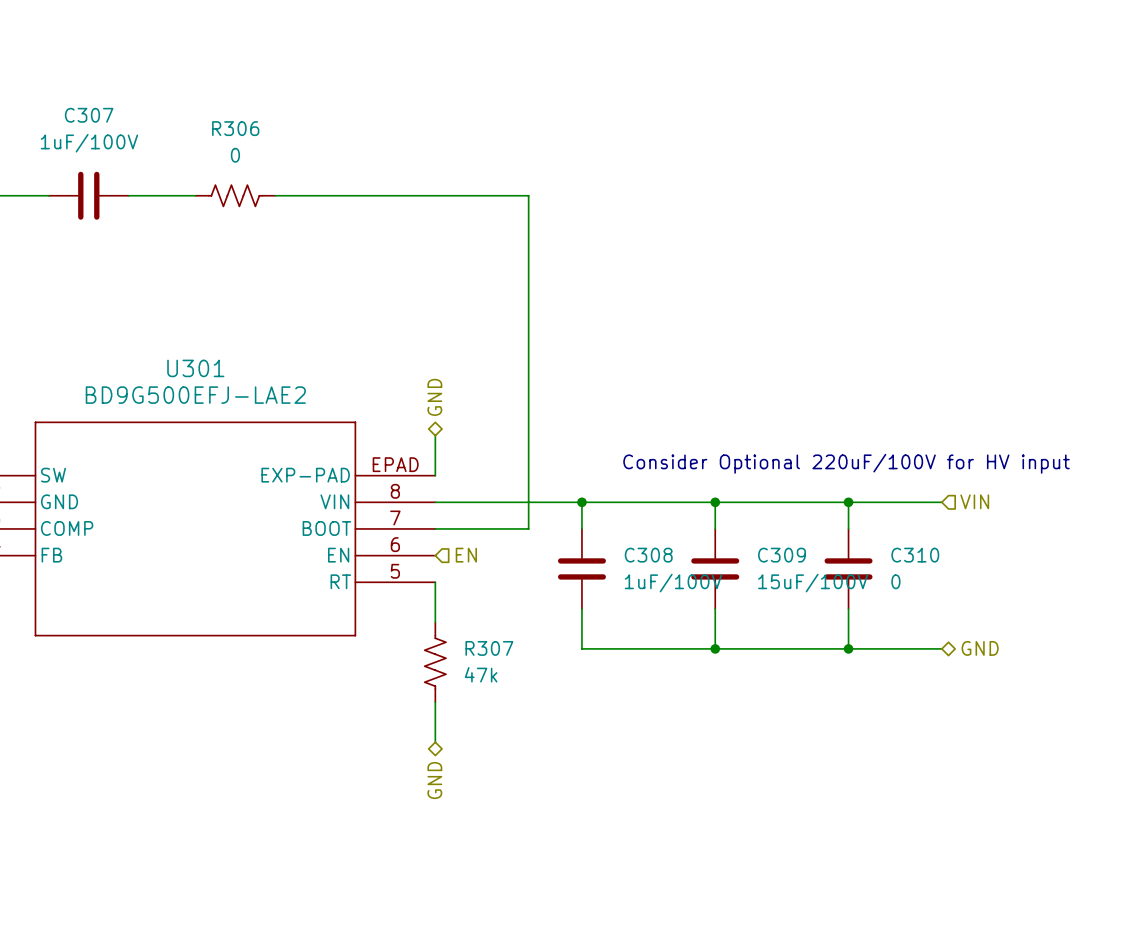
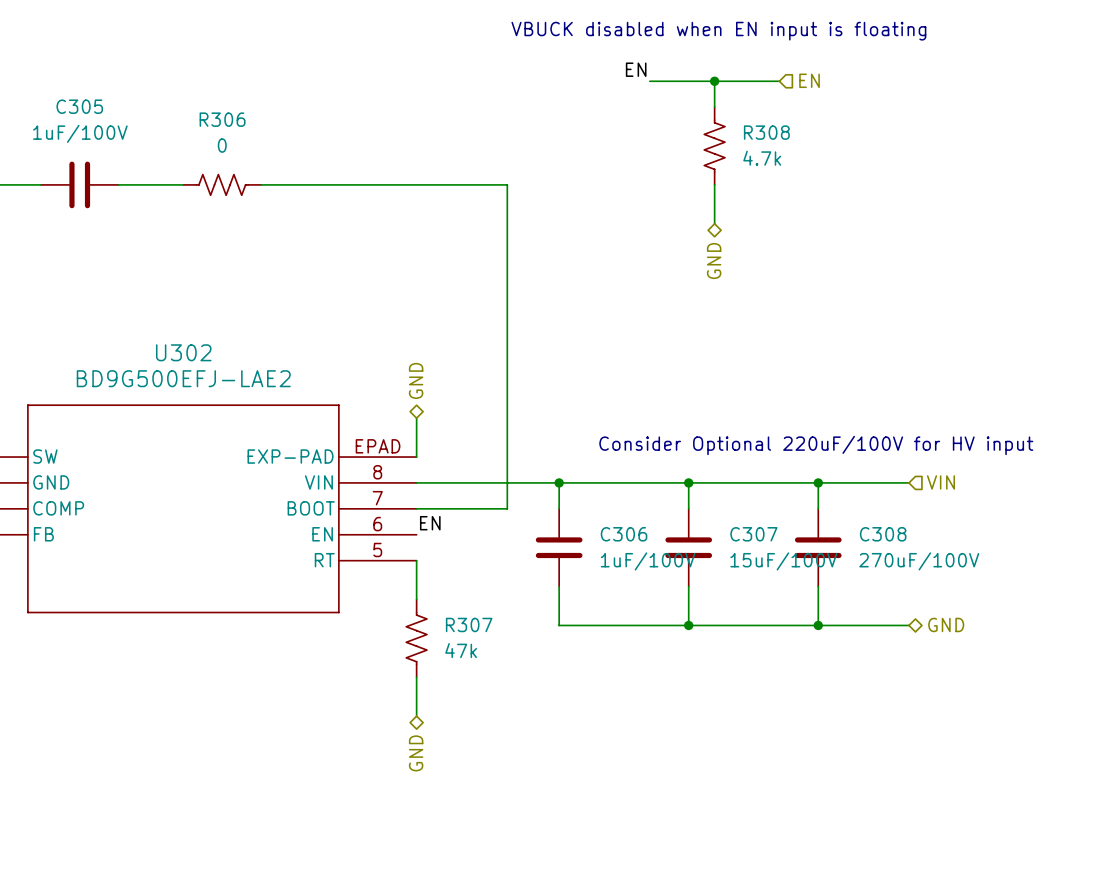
text: none -> VBUCK disabled when EN input is floating (718, 31)
label: none -> EN (636, 69)
hierarchical label: none -> EN (809, 80)
wire: none -> (649, 81) (779, 81)
wire: none -> (714, 81) (714, 107)
junction: none -> (714, 81)
C307 name: C307 (89, 115) -> C305 (79, 106)
R308: none -> 4.7k (714, 146)
wire: none -> (714, 184) (714, 223)
hierarchical label: none -> GND (714, 261)
U301 name: U301 (195, 368) -> U302 (183, 352)
label: none -> EN (430, 523)
hierarchical label: EN (466, 555) -> none
C308 name: C308 (648, 555) -> C306 (624, 534)
C309 name: C309 (781, 555) -> C307 (753, 534)
C310 name: C310 (915, 555) -> C308 (883, 534)
C310 value: 0 (895, 581) -> 270uF/100V (919, 561)

